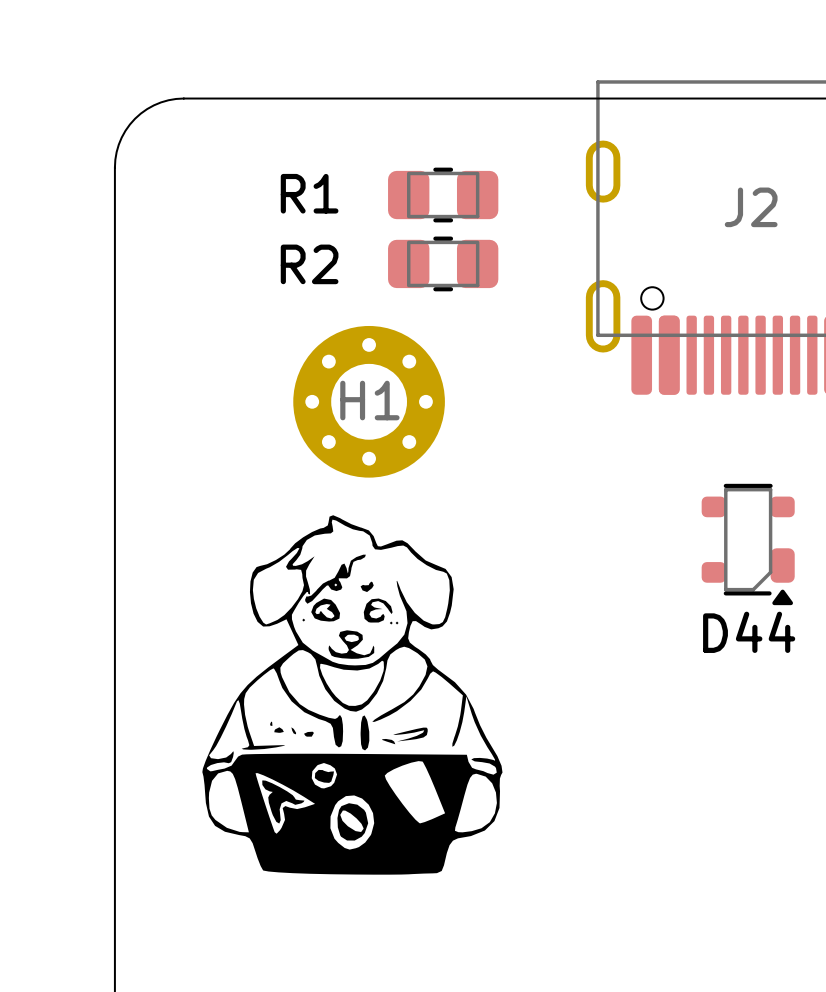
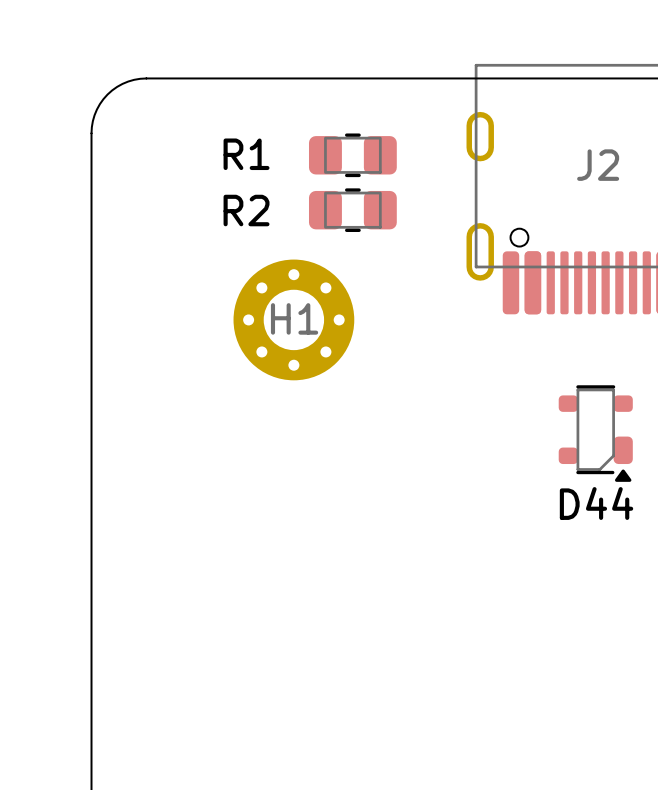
drawing: [202, 515, 503, 875] -> none

